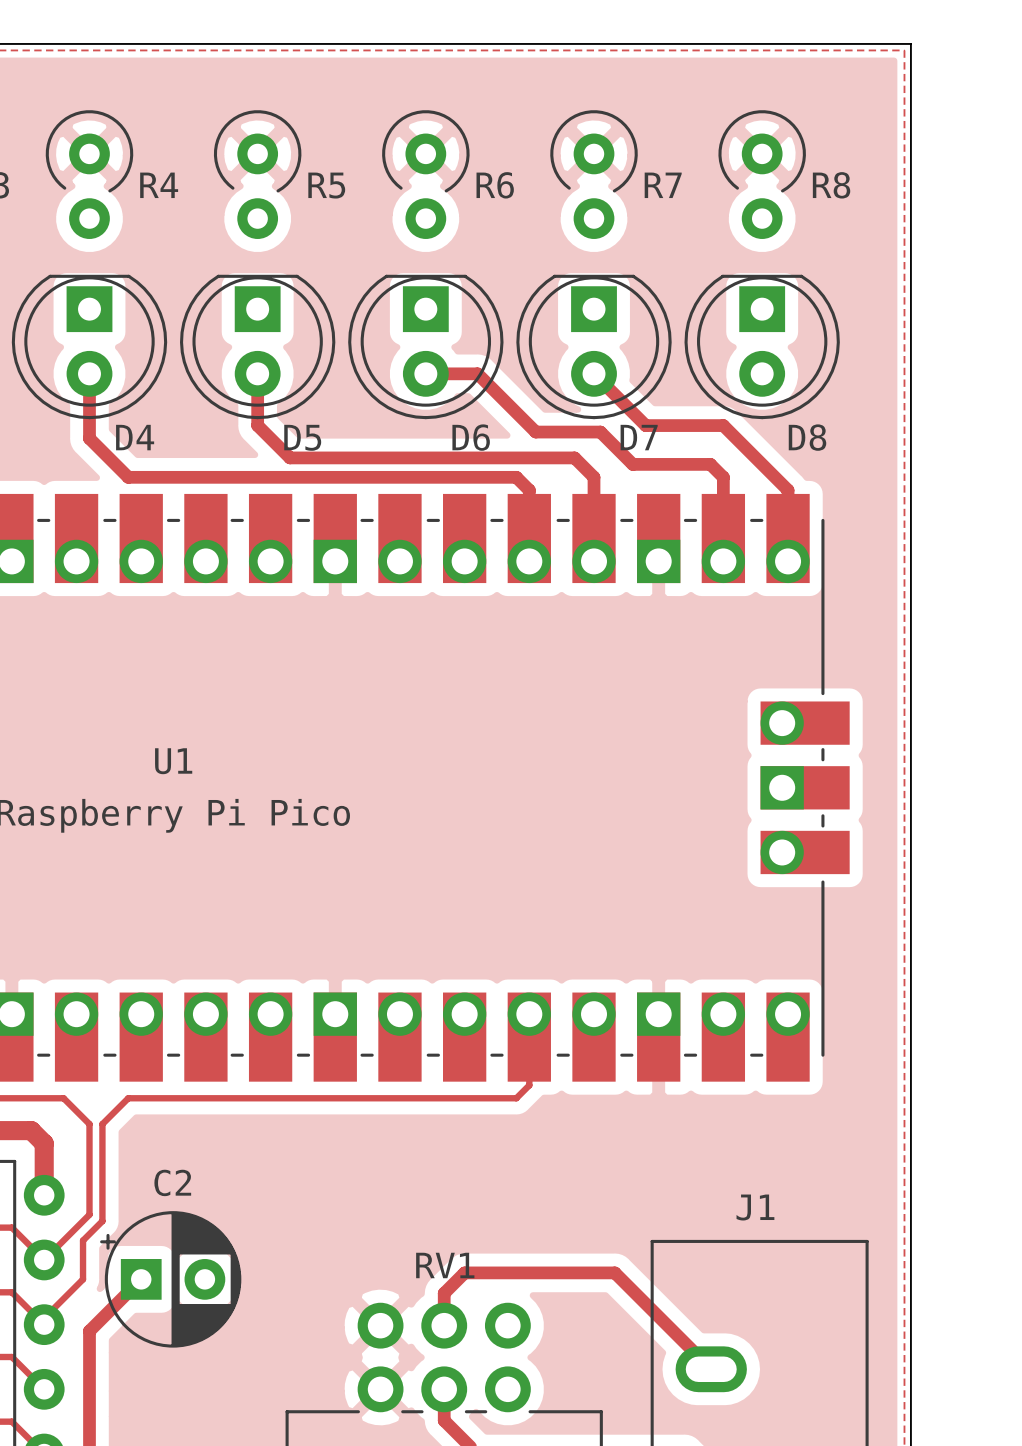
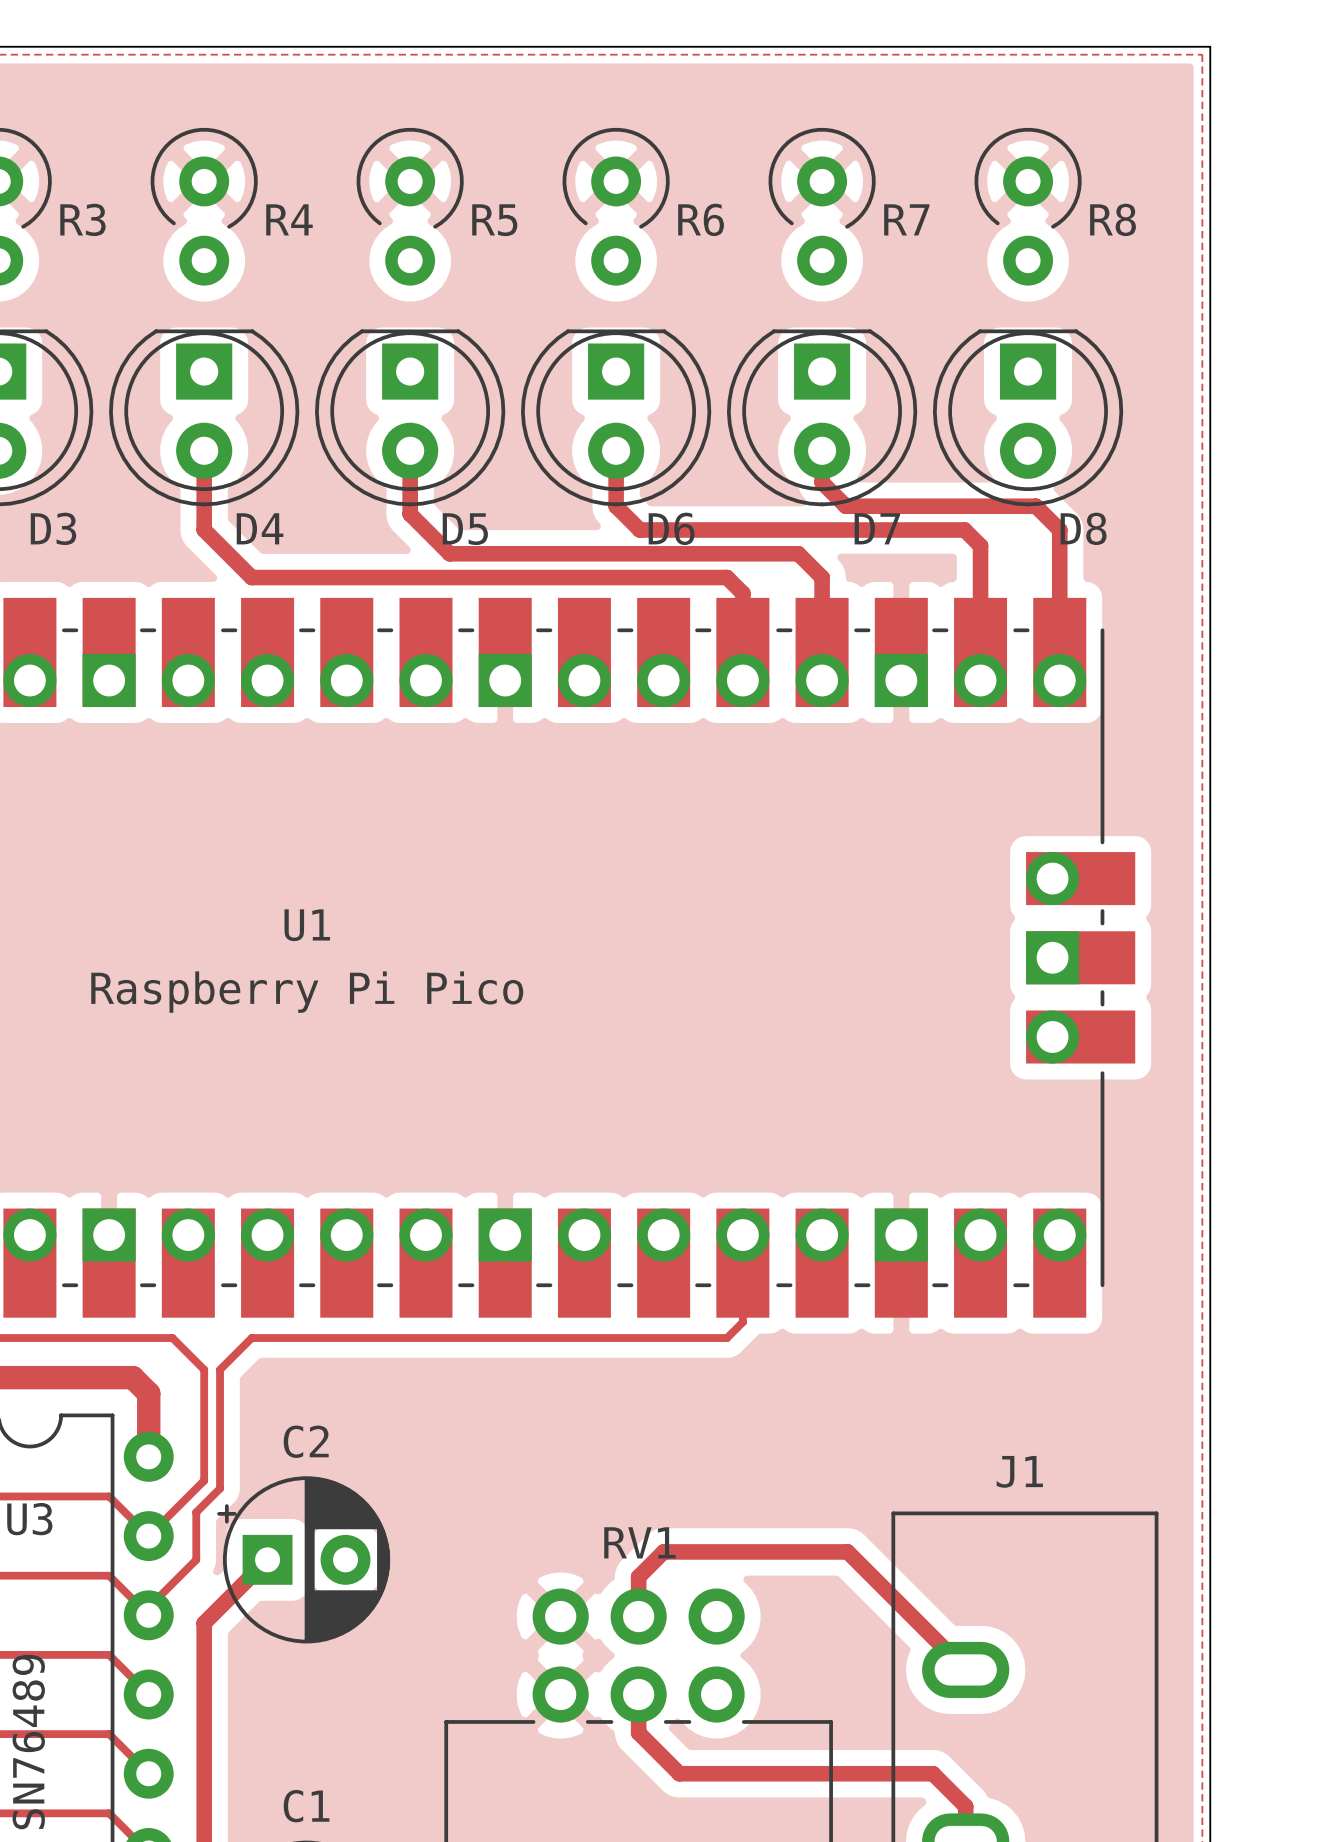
track: (425, 373) (477, 373) (535, 432) (600, 432) (632, 464) (710, 464) (723, 477) -> (616, 450) (616, 506) (639, 530) (964, 530) (980, 545) (980, 577)
track: (594, 373) (645, 425) (723, 425) (788, 490) -> (822, 450) (822, 482) (845, 506) (1035, 506) (1059, 530) (1059, 593)

